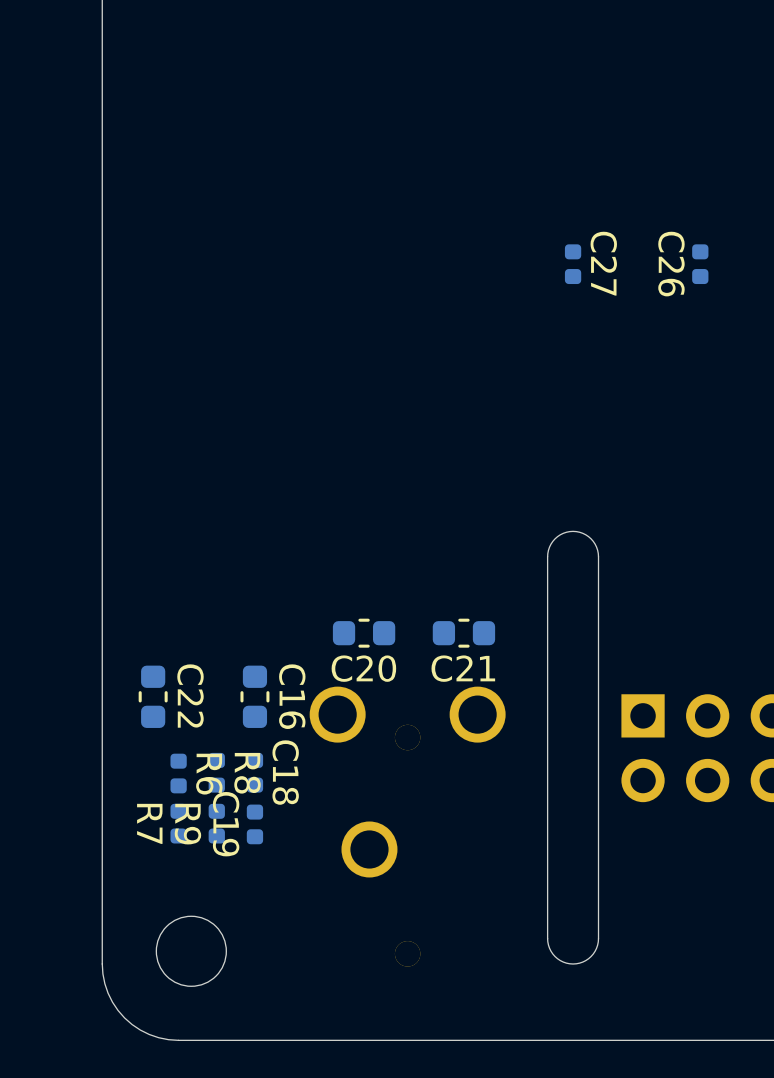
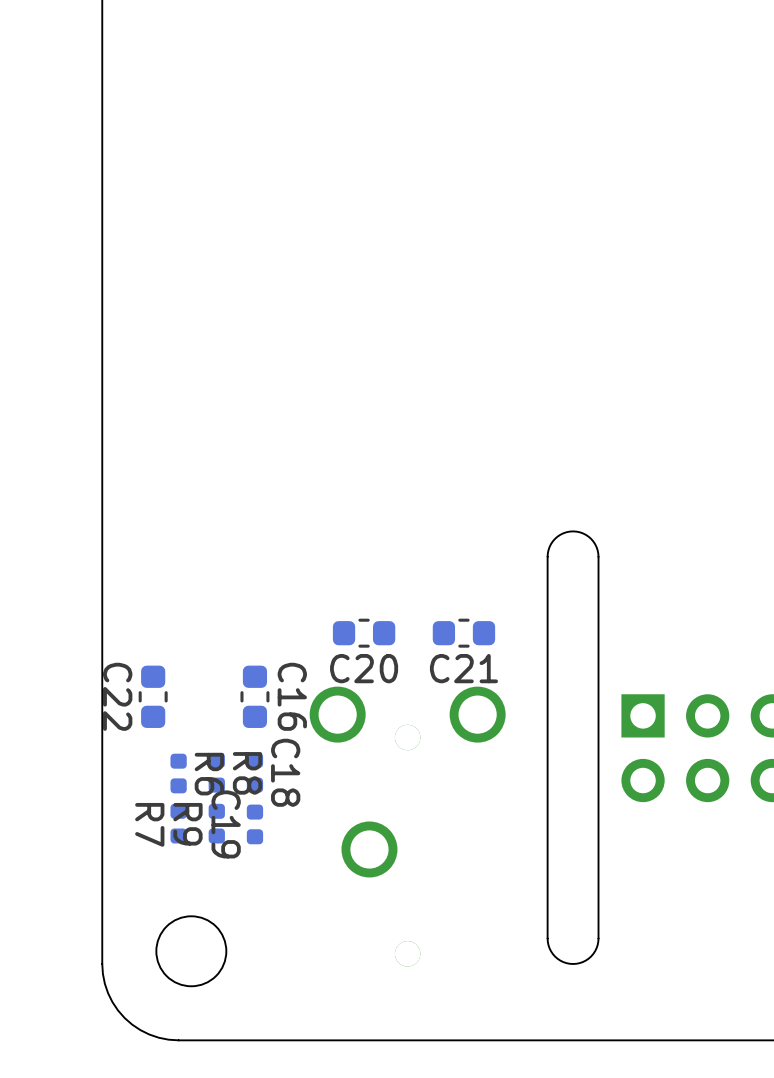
C27: (573, 264) -> none
C26: (700, 264) -> none
C22 name position: C22 (190, 696) -> C22 (117, 696)

